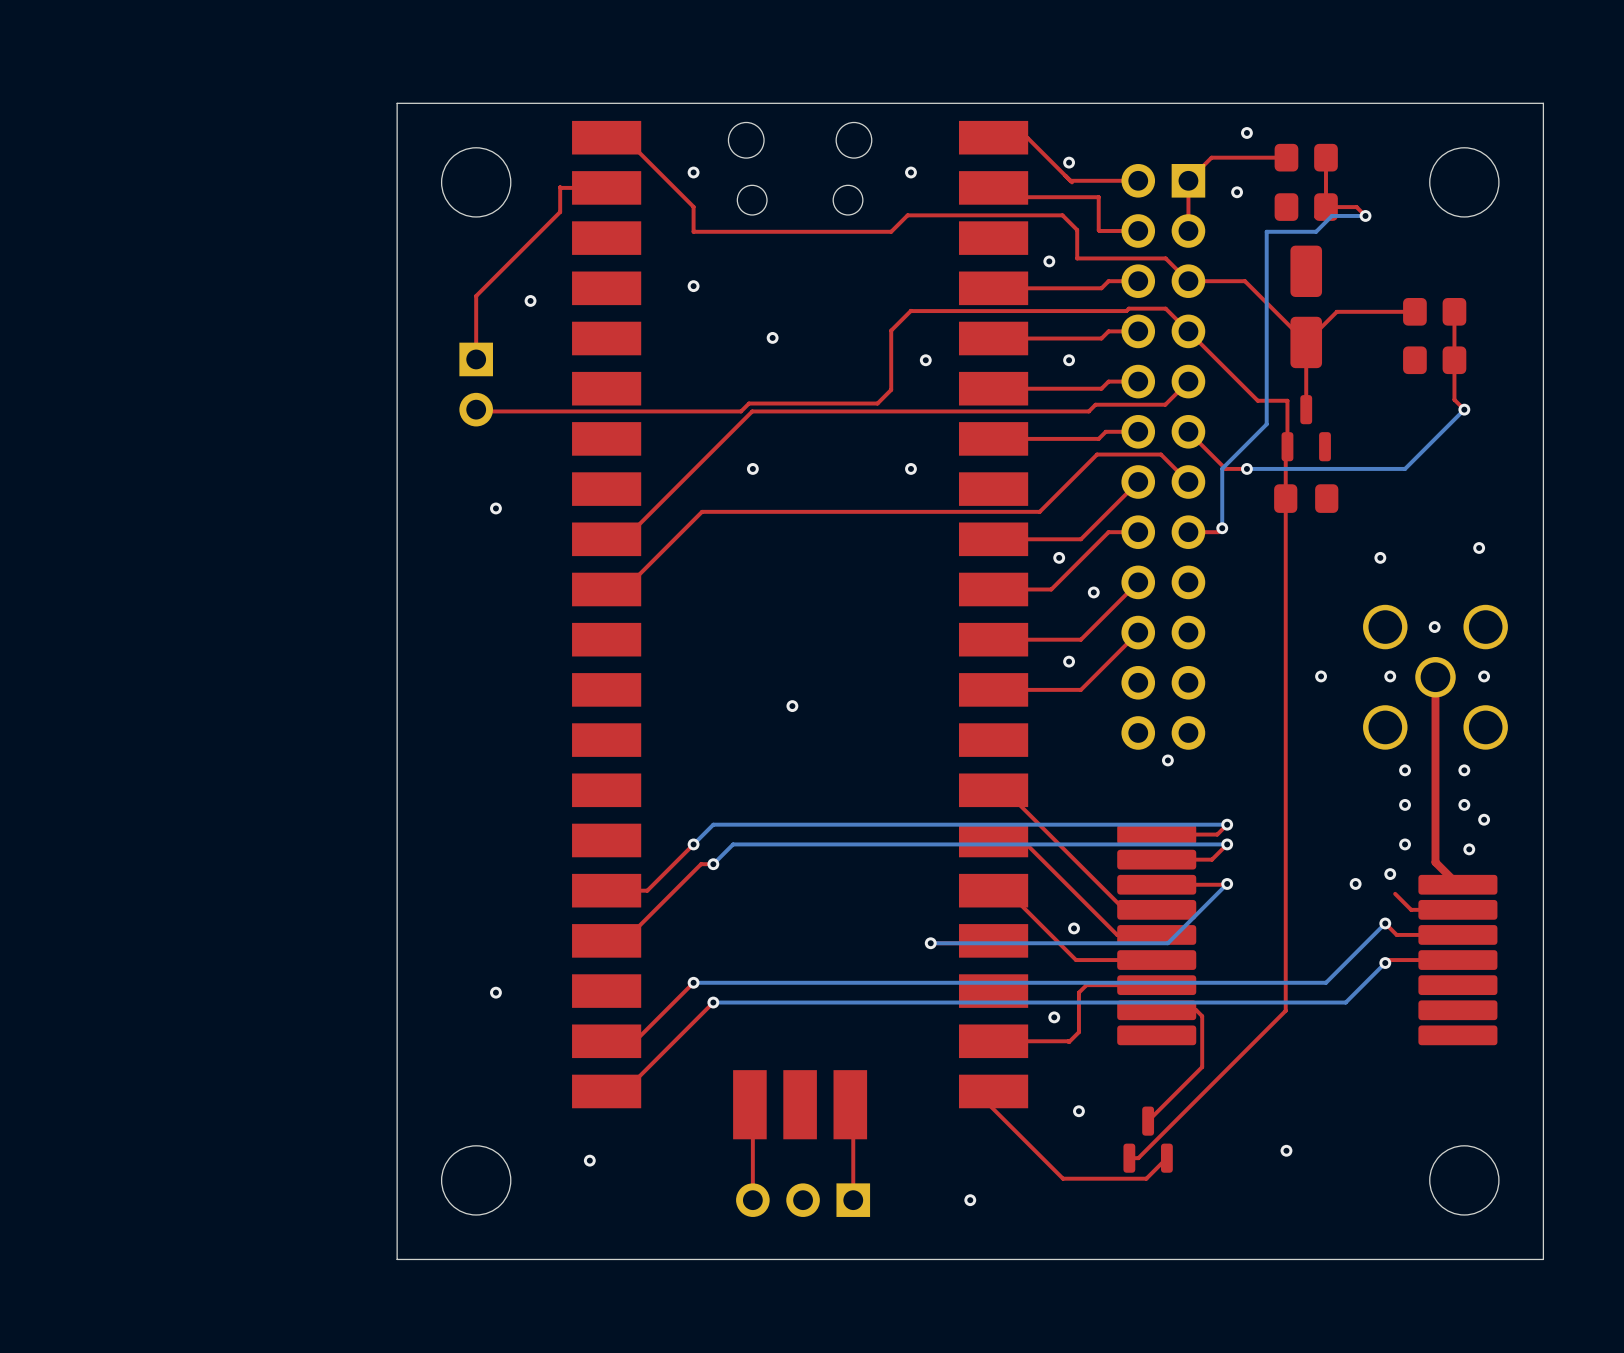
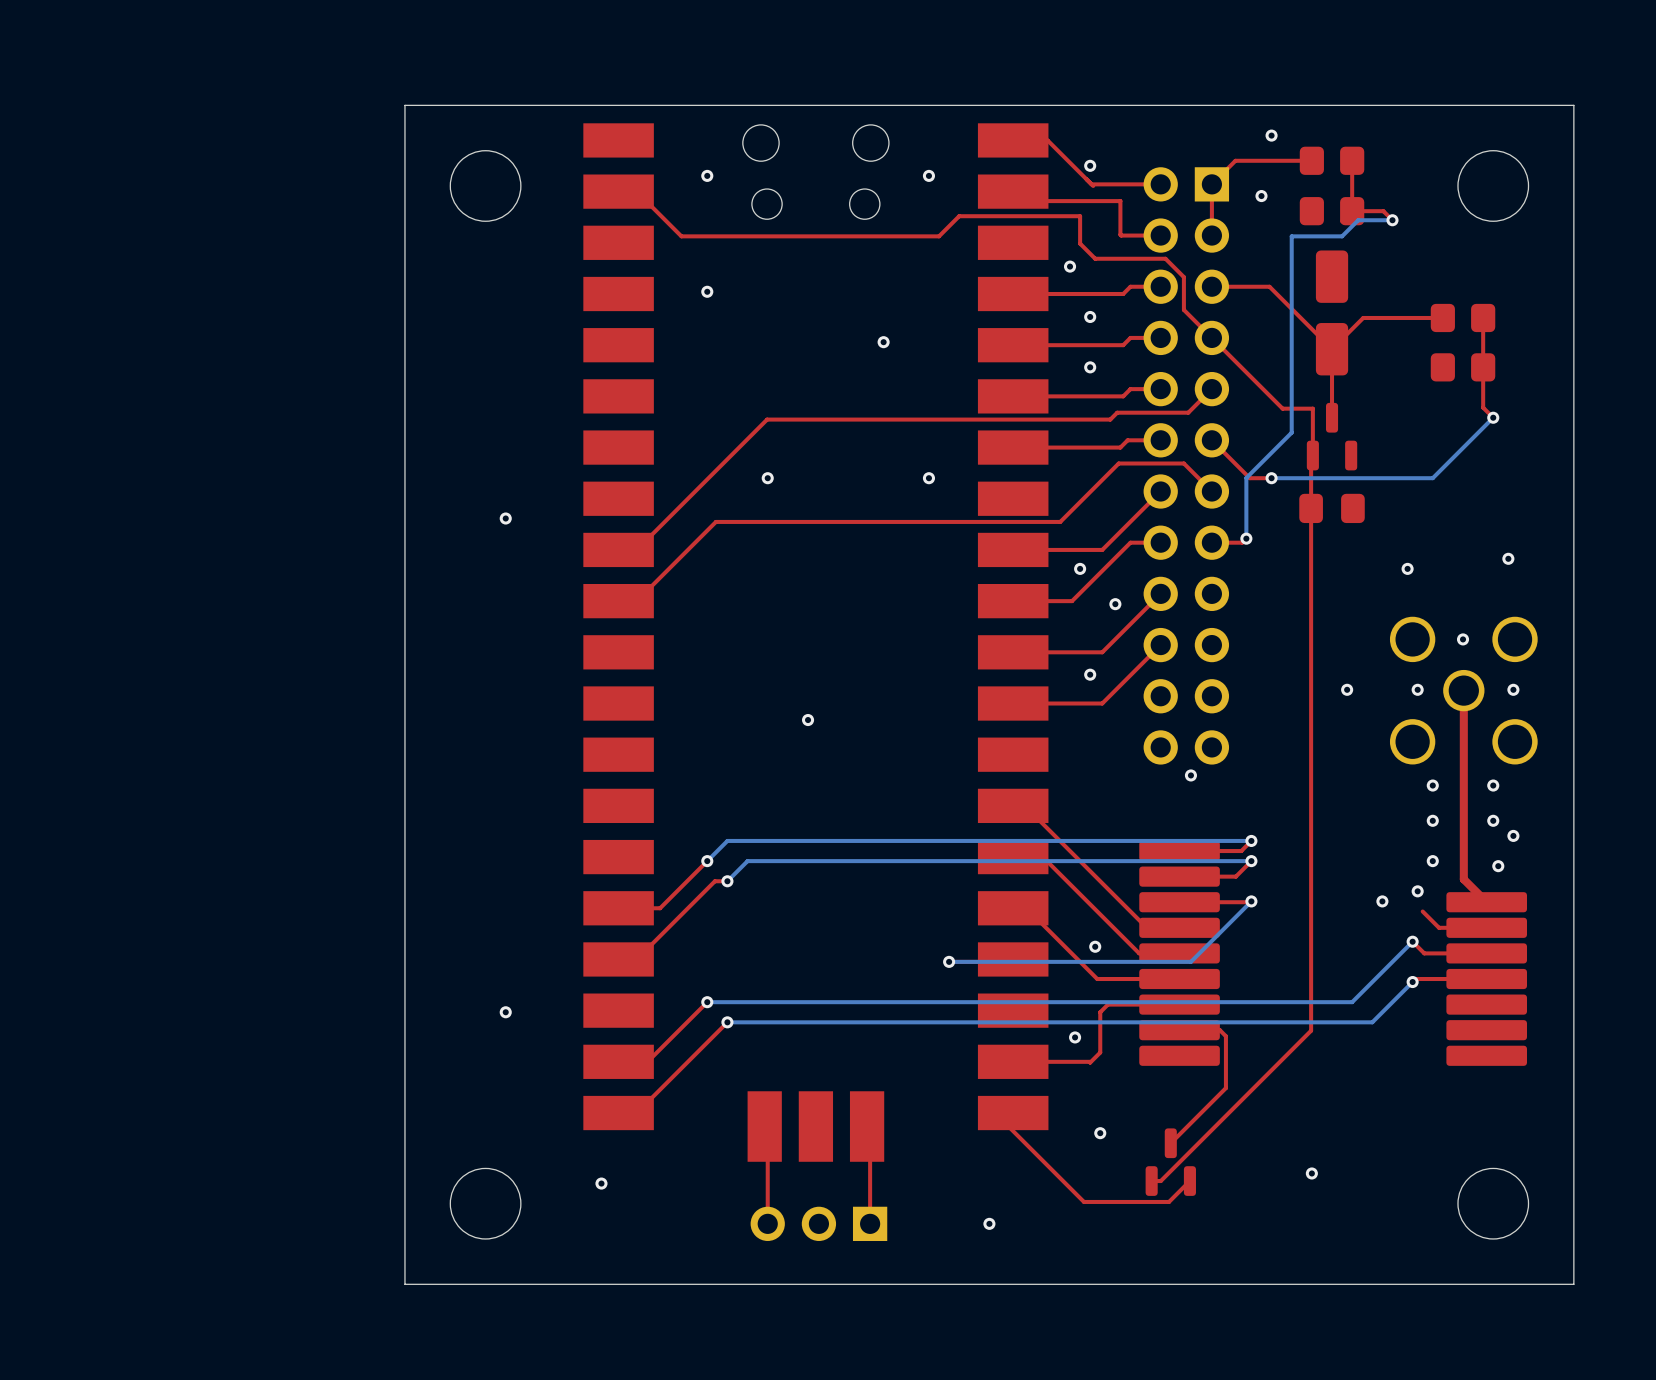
top track: (624, 137) (693, 206) (693, 231) -> (636, 191) (681, 236) (707, 236)
top track: (624, 187) (560, 187) (560, 212) (476, 296) (476, 359) -> none
top track: (891, 231) (907, 215) (1062, 215) (1077, 230) (1077, 258) (1165, 258) (1188, 281) -> (908, 236) (939, 236) (959, 216) (1080, 216) (1080, 243) (1095, 258) (1165, 258) (1183, 277) (1183, 309) (1188, 314)
via: (530, 300) -> none
top track: (1165, 308) (1128, 308) (1126, 311) (911, 311) -> none
top track: (910, 310) (891, 330) (891, 389) (877, 403) (748, 403) (741, 411) (477, 411) (476, 409) -> none
via: none -> (1090, 316)
via: none -> (883, 342)
via: (772, 337) -> none
via: (925, 360) -> none
part: (476, 384) -> none

